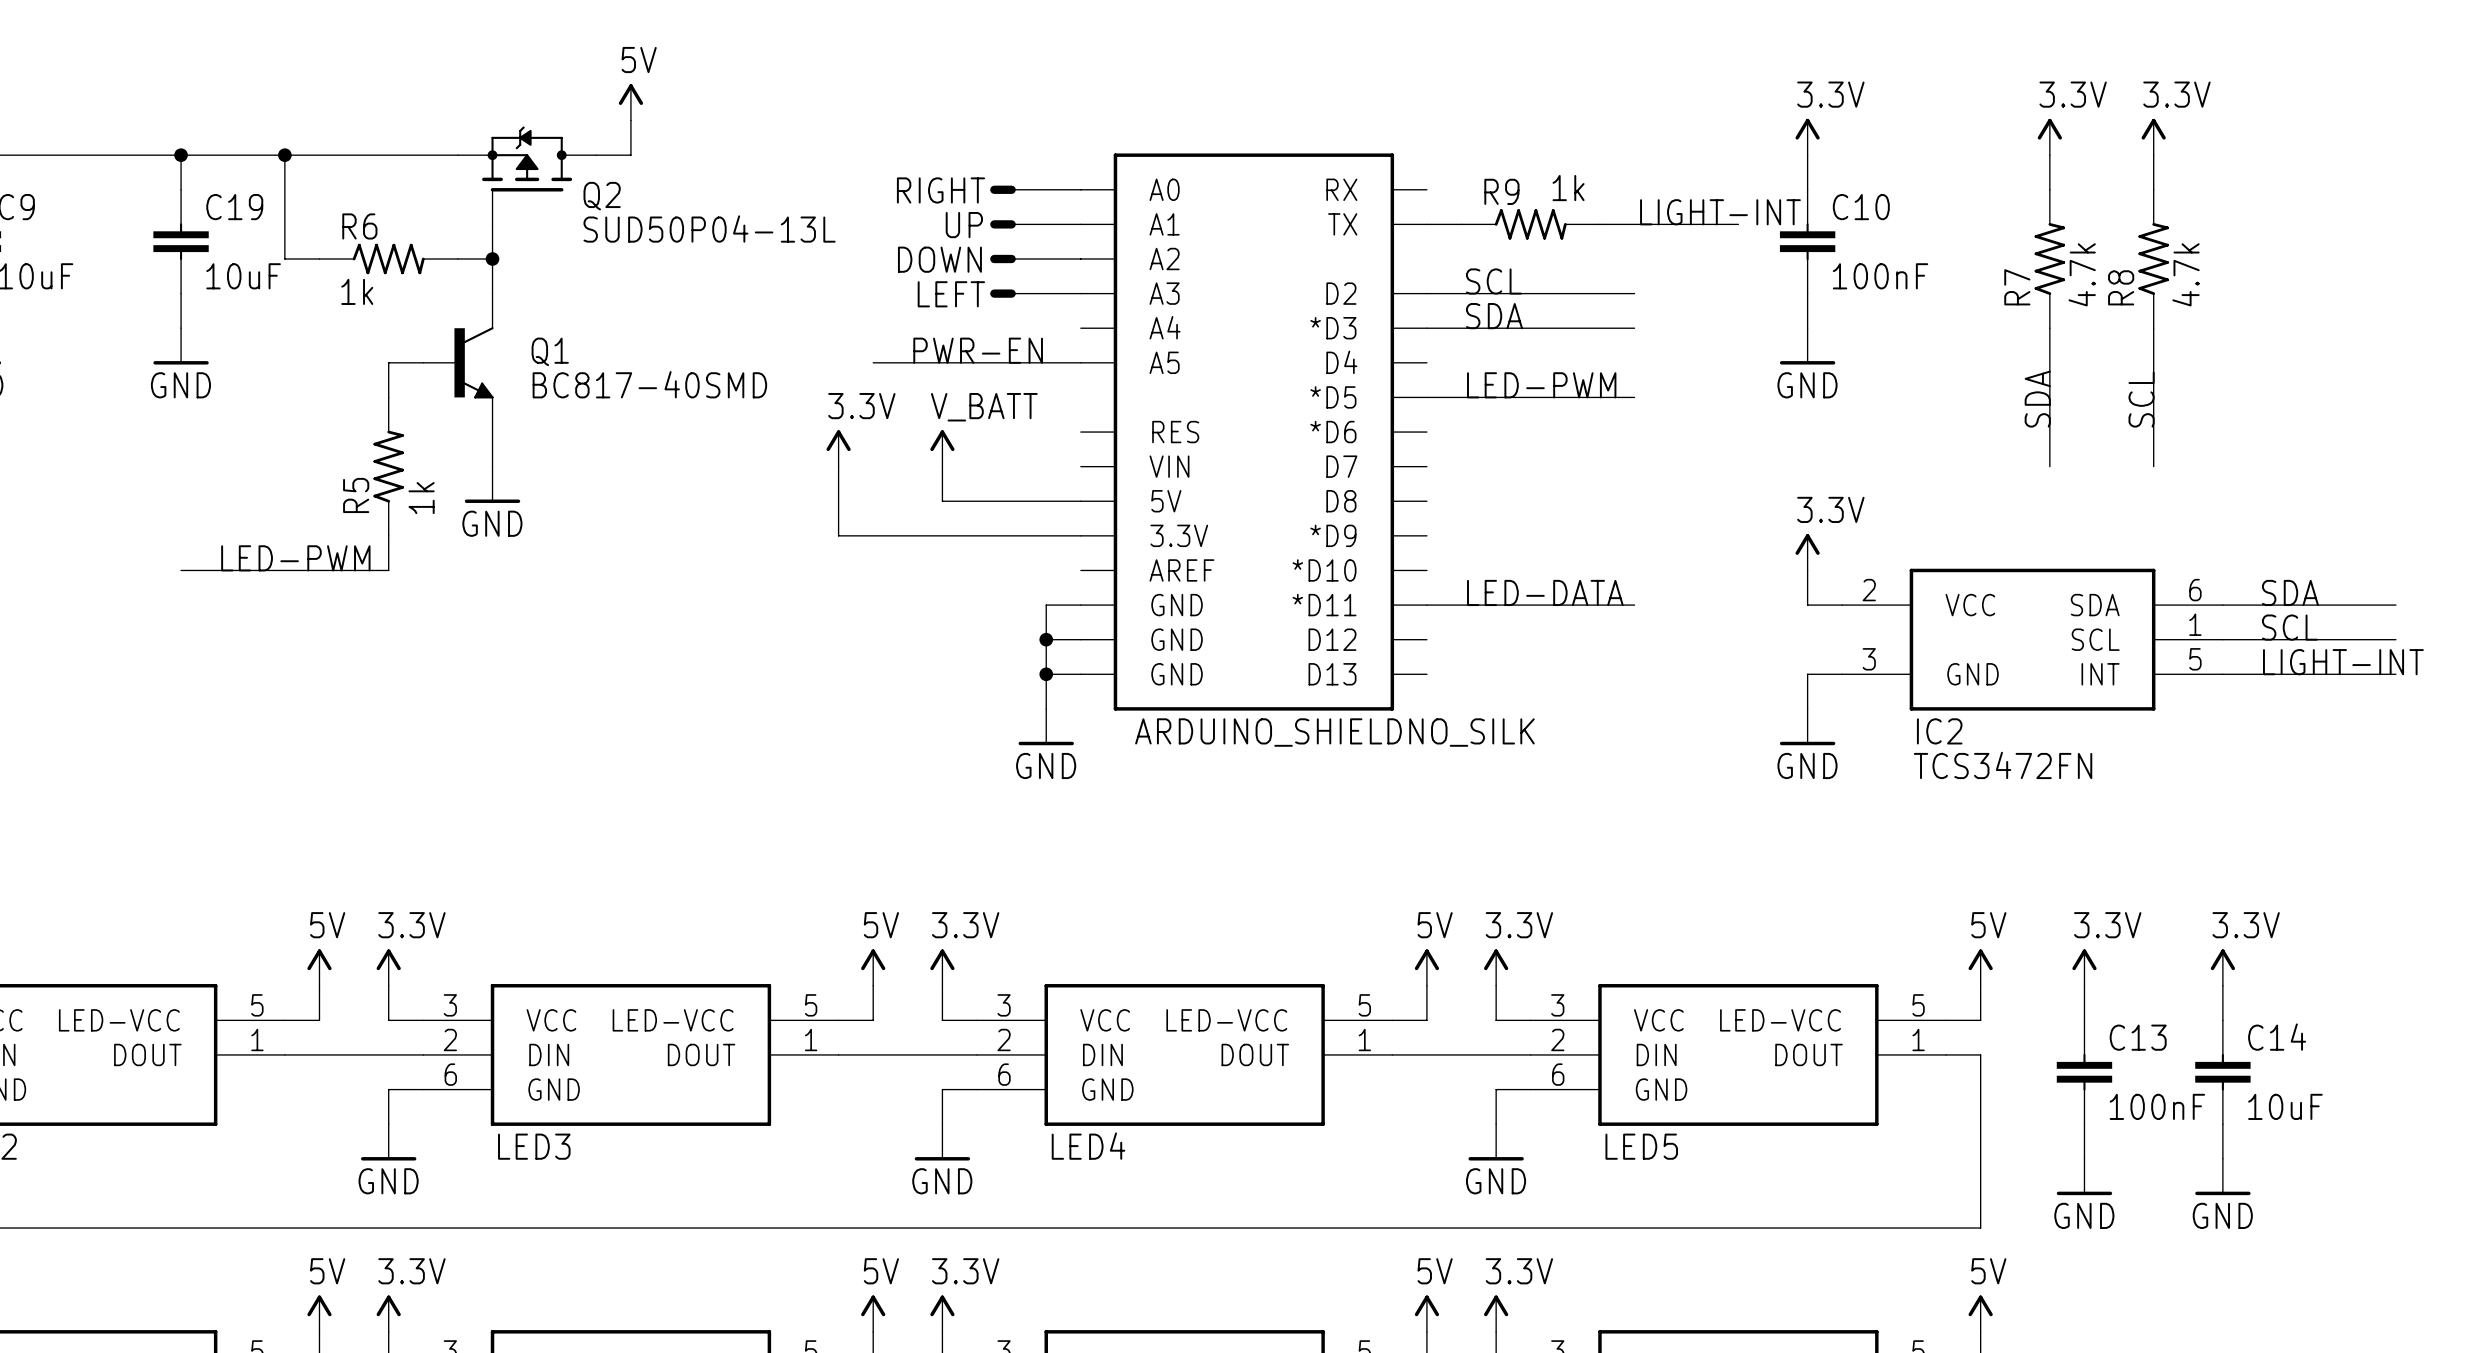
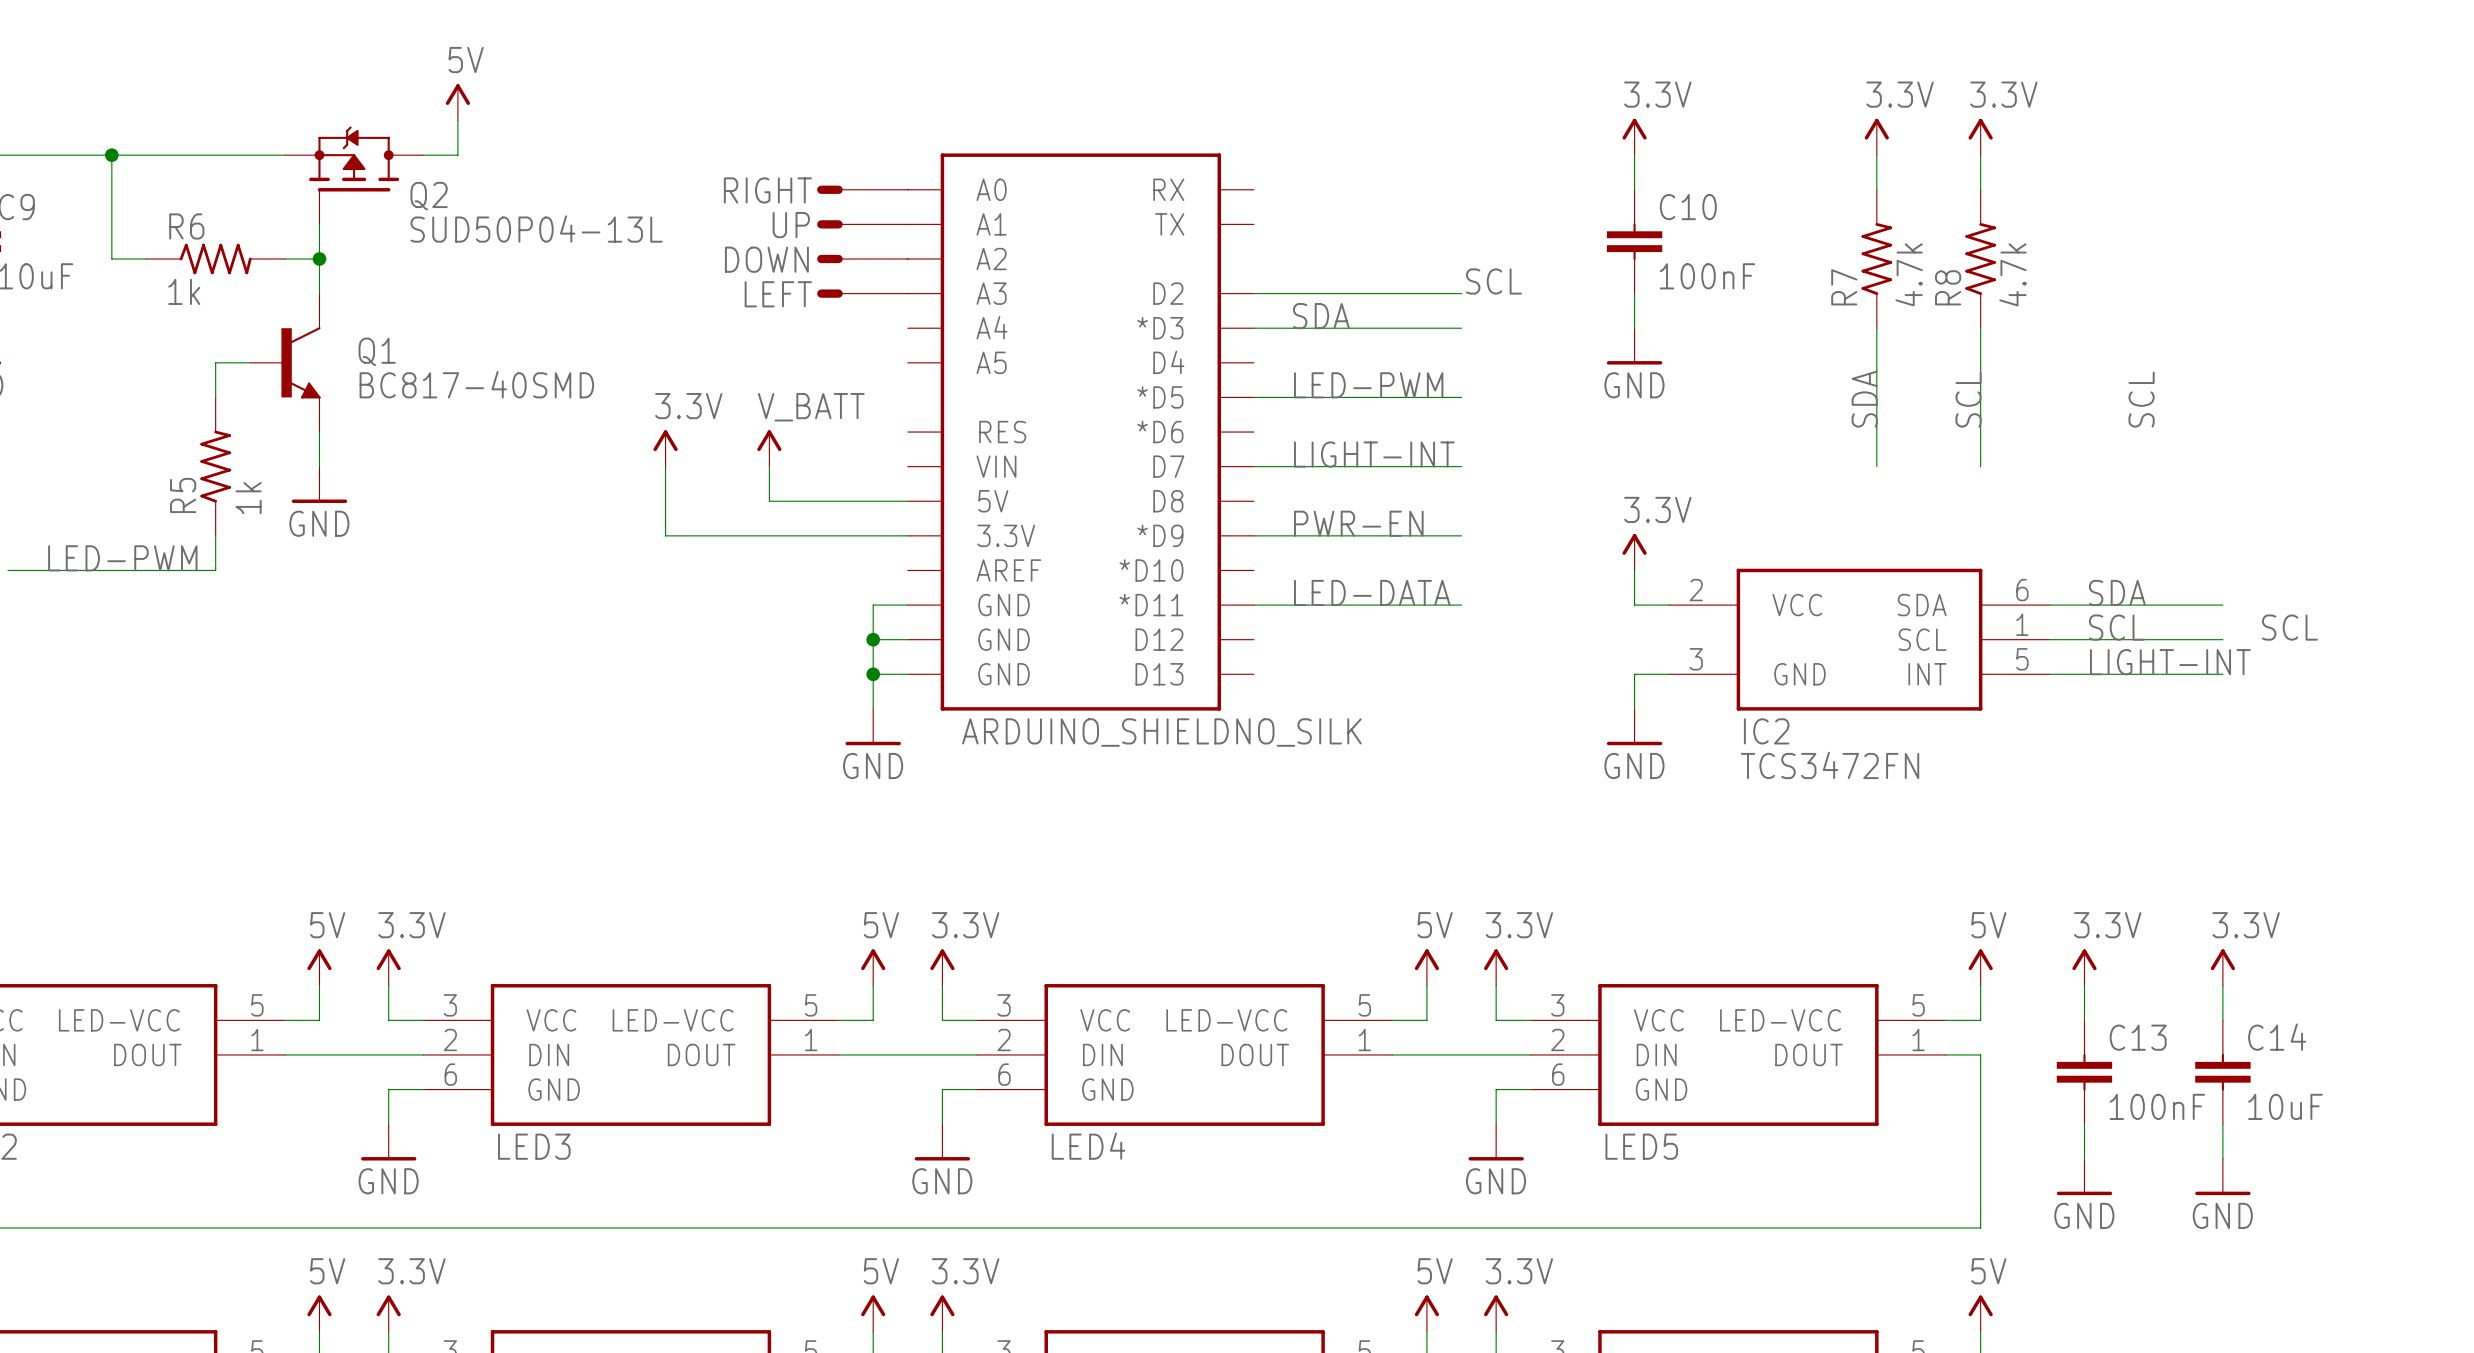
power symbol position: 5V (630, 102) -> 5V (457, 102)
wire: (630, 120) (630, 155) (596, 155) -> none
power symbol: none -> 3.3V (1634, 137)
power symbol position: 3.3V (1807, 137) -> 3.3V (1876, 137)
power symbol position: 3.3V (2049, 137) -> 3.3V (1980, 137)
power symbol: 3.3V (2153, 137) -> none
wire: none -> (111, 155) (111, 259) (146, 259)
wire: (181, 155) (181, 189) -> (457, 120) (457, 155)
junction position: (181, 155) -> (111, 155)
junction: (284, 155) -> none
wire: (423, 155) (284, 155) (284, 259) -> none
wire: (1807, 155) (1807, 189) -> (1634, 155) (1634, 189)
wire: (2049, 155) (2049, 189) -> (1876, 155) (1876, 189)
wire: (2153, 155) (2153, 189) -> (1980, 155) (1980, 189)
Q2 position: (527, 175) -> (354, 175)
RIGHT position: (1035, 189) -> (862, 189)
label: LIGHT-INT (1720, 212) -> none
wire: (492, 224) (492, 293) -> (319, 224) (319, 293)
UP position: (1035, 224) -> (862, 224)
wire: (1426, 224) (1461, 224) -> none
R9: 1k (1530, 224) -> none
wire: (1599, 224) (1738, 224) -> none
C19: 10uF (181, 241) -> none
C10 position: (1807, 241) -> (1634, 241)
junction: none -> (319, 259)
R6 position: (388, 259) -> (215, 259)
wire: (457, 259) (492, 259) -> none
junction: (492, 259) -> none
DOWN position: (1035, 259) -> (862, 259)
R7 position: (2049, 259) -> (1876, 259)
R8 position: (2153, 259) -> (1980, 259)
wire: (181, 293) (181, 328) -> none
LEFT position: (1035, 293) -> (862, 293)
wire: none -> (1253, 293) (1426, 293)
wire: (1461, 293) (1634, 293) -> (1634, 328) (1634, 293)
wire: (1807, 293) (1807, 328) -> none
label position: SDA (1494, 316) -> SDA (1321, 316)
wire: (1461, 328) (1634, 328) -> (1253, 328) (1426, 328)
wire: (2049, 328) (2049, 466) -> (1876, 328) (1876, 466)
wire: (2153, 328) (2153, 466) -> (1980, 328) (1980, 466)
power symbol: GND (181, 346) -> none
power symbol position: GND (1807, 346) -> GND (1634, 346)
label: PWR-EN (978, 350) -> none
wire: (423, 362) (388, 362) (388, 397) -> (250, 362) (215, 362) (215, 397)
Q1 position: (458, 362) -> (285, 362)
wire: (873, 362) (1080, 362) -> none
label position: LED-PWM (1541, 385) -> LED-PWM (1368, 385)
wire: (1461, 397) (1634, 397) -> (1253, 397) (1426, 397)
label: none -> SDA (1864, 399)
label: none -> SCL (1968, 399)
label: SDA (2037, 399) -> none
wire: (492, 432) (492, 466) -> (319, 432) (319, 466)
part position: (1253, 432) -> (1080, 432)
power symbol position: 3.3V (838, 448) -> 3.3V (665, 448)
power symbol position: V_BATT (942, 448) -> V_BATT (769, 448)
label: none -> LIGHT-INT (1374, 454)
R5 position: (388, 466) -> (215, 466)
wire: (838, 466) (838, 535) -> (665, 466) (665, 535) (838, 535)
wire: (942, 466) (942, 501) (1080, 501) -> (769, 466) (769, 501) (907, 501)
wire: none -> (1253, 466) (1461, 466)
power symbol: none -> GND (319, 484)
power symbol: GND (492, 484) -> none
label: none -> PWR-EN (1358, 523)
wire: (388, 535) (388, 570) (215, 570) -> (215, 535) (215, 570)
wire: (907, 535) (1080, 535) -> none
wire: none -> (1253, 535) (1461, 535)
power symbol position: 3.3V (1807, 552) -> 3.3V (1634, 552)
label position: LED-PWM (295, 558) -> LED-PWM (122, 558)
wire: none -> (8, 570) (181, 570)
wire: (1807, 570) (1807, 605) (1842, 605) -> (1634, 570) (1634, 605) (1669, 605)
label position: LED-DATA (1545, 592) -> LED-DATA (1372, 592)
label: none -> SDA (2117, 592)
label: SDA (2290, 592) -> none
wire: (1080, 605) (1046, 605) (1046, 708) -> (907, 605) (873, 605) (873, 708)
wire: (1461, 605) (1634, 605) -> (1253, 605) (1426, 605)
wire: (2222, 605) (2395, 605) -> (2222, 605) (2049, 605)
label: none -> SCL (2116, 627)
junction: none -> (873, 639)
wire: (1046, 639) (1080, 639) -> (873, 639) (907, 639)
junction: (1046, 639) -> none
IC2 position: (2032, 639) -> (1859, 639)
wire: (2222, 639) (2395, 639) -> (2222, 639) (2049, 639)
label position: LIGHT-INT (2343, 662) -> LIGHT-INT (2170, 662)
junction: none -> (873, 674)
wire: (1046, 674) (1080, 674) -> (873, 674) (907, 674)
junction: (1046, 674) -> none
wire: (1842, 674) (1807, 674) (1807, 708) -> (1669, 674) (1634, 674) (1634, 708)
wire: (2222, 674) (2395, 674) -> (2222, 674) (2049, 674)
power symbol position: GND (1046, 727) -> GND (873, 727)
power symbol position: GND (1807, 727) -> GND (1634, 727)

